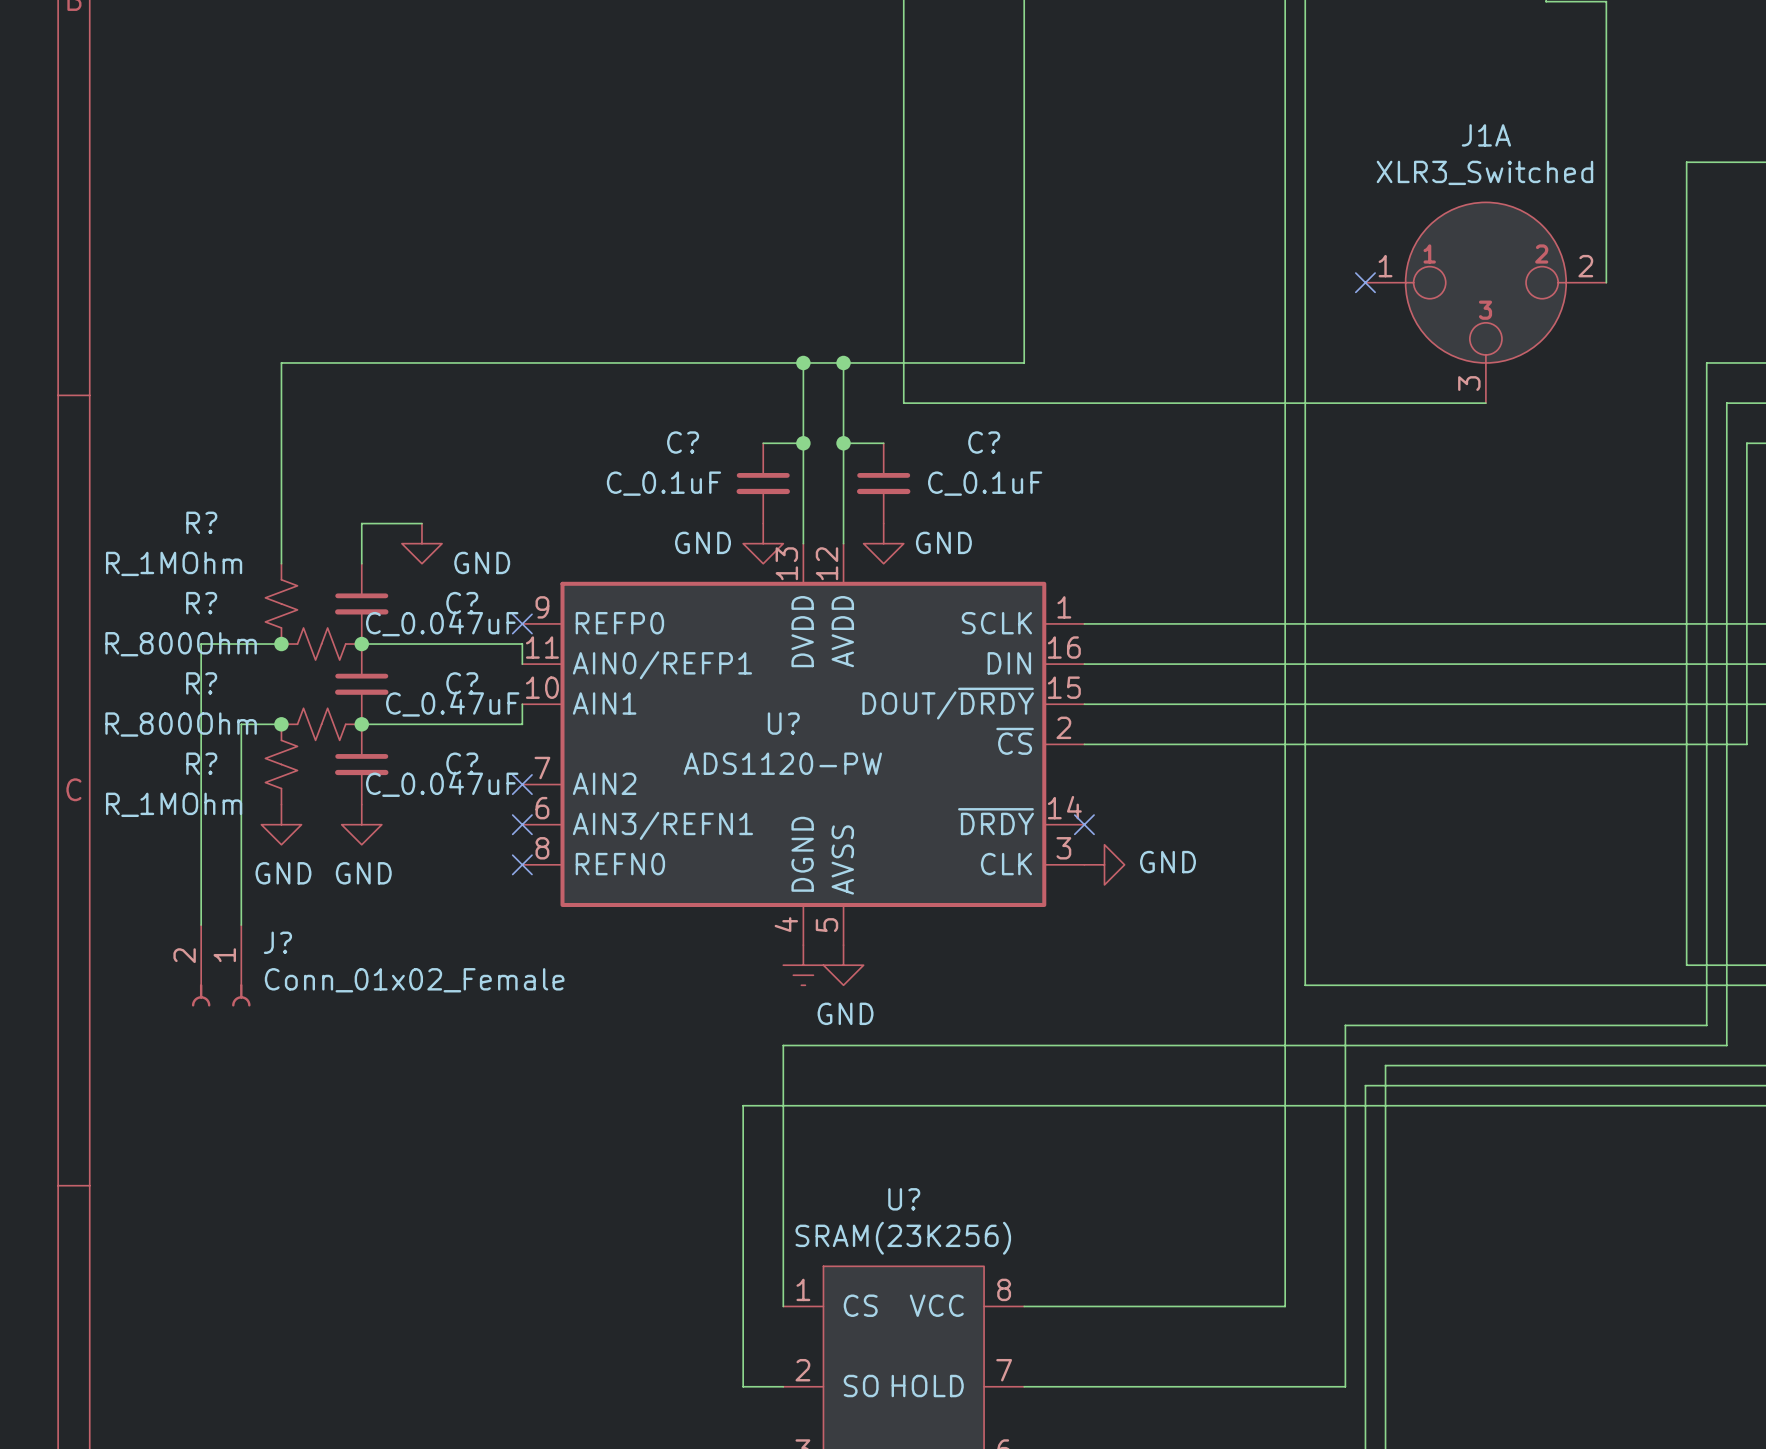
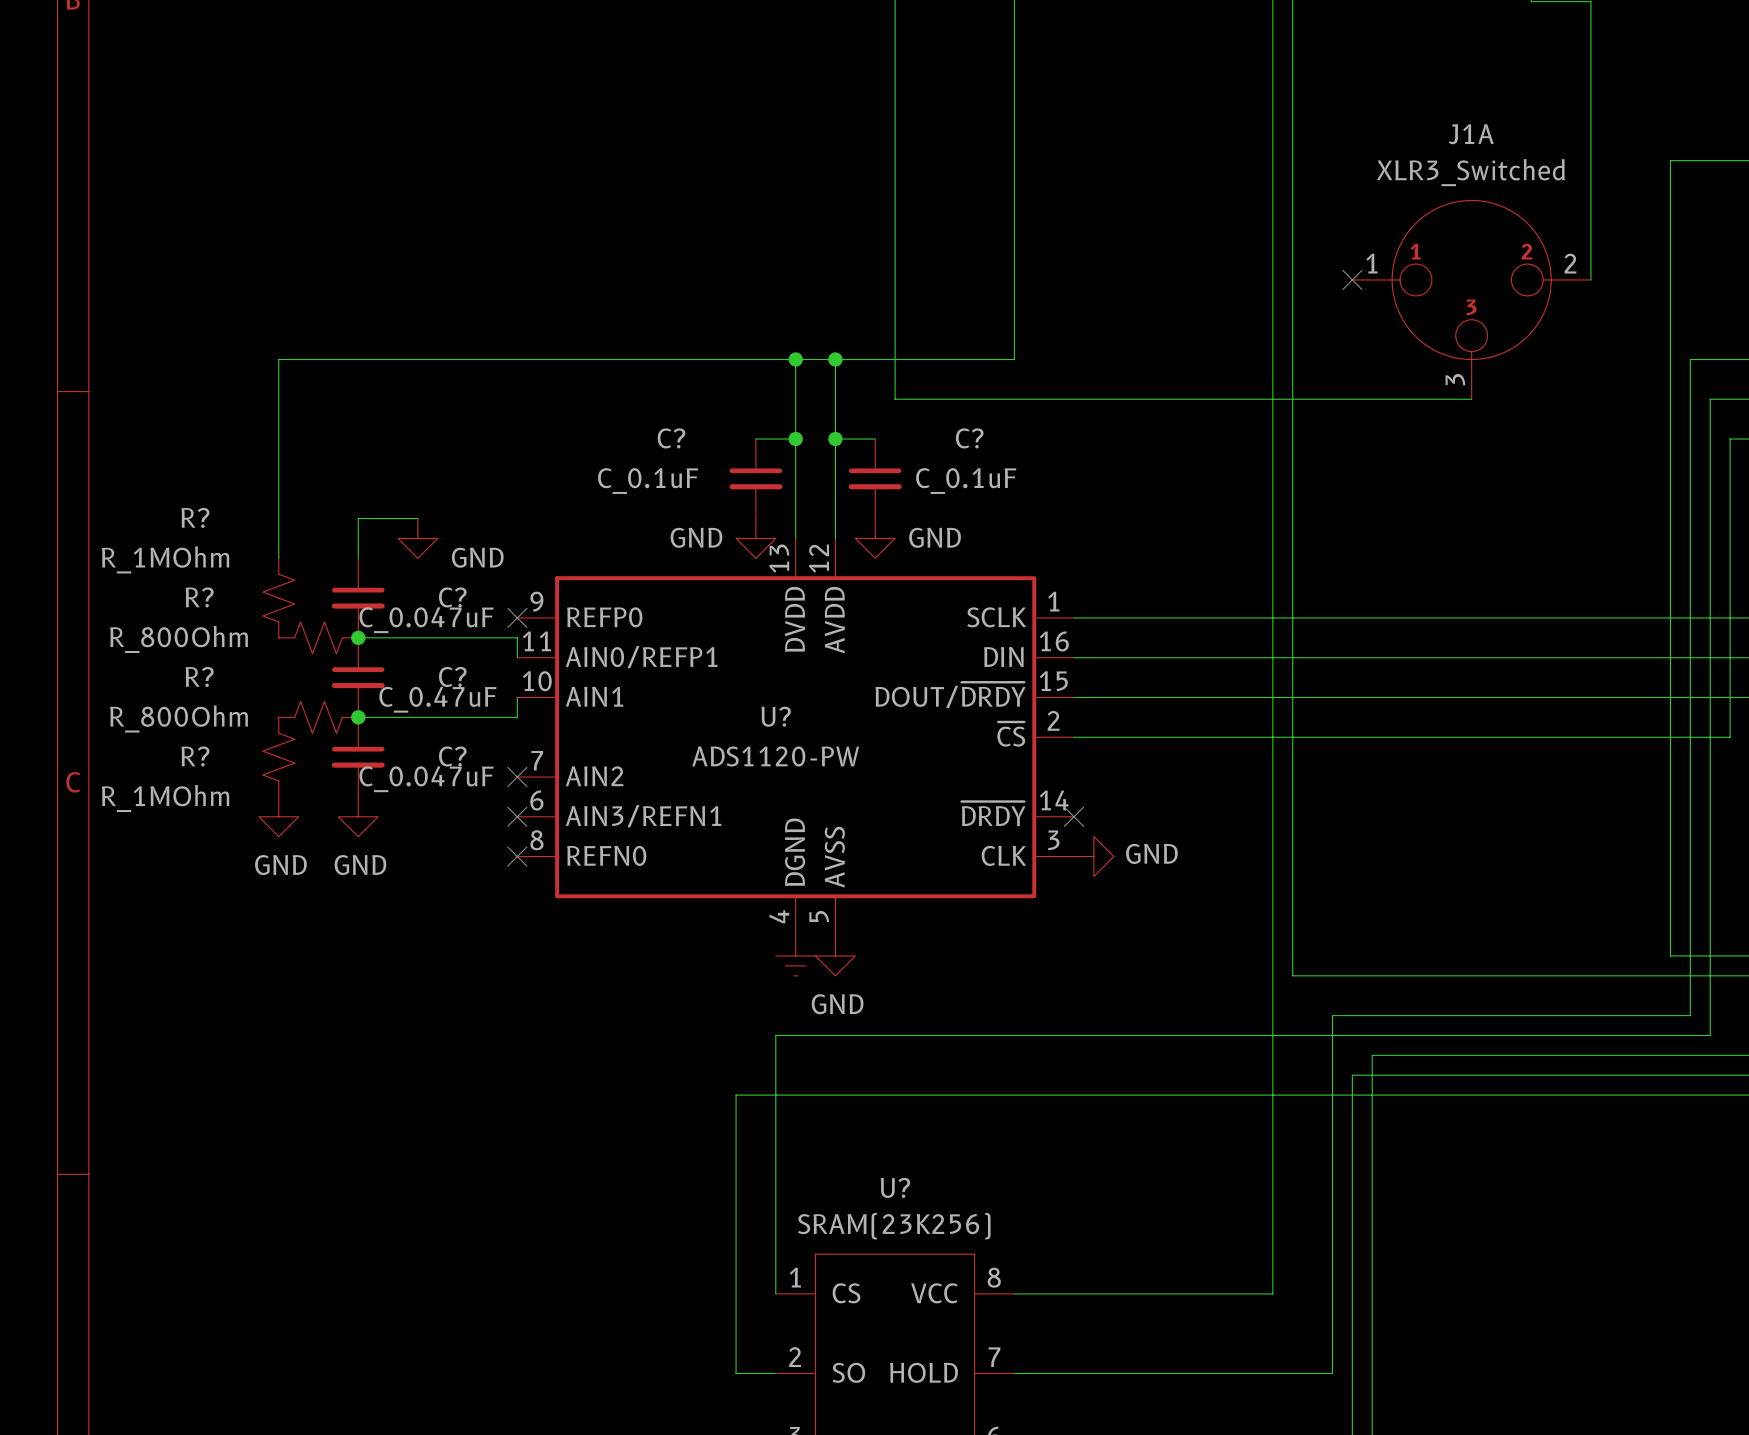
wire: (281, 644) (201, 644) (201, 925) -> none
junction: (281, 644) -> none
wire: (281, 724) (241, 724) (241, 925) -> none
junction: (281, 724) -> none
J?: Conn_01x02_Female (221, 965) -> none

